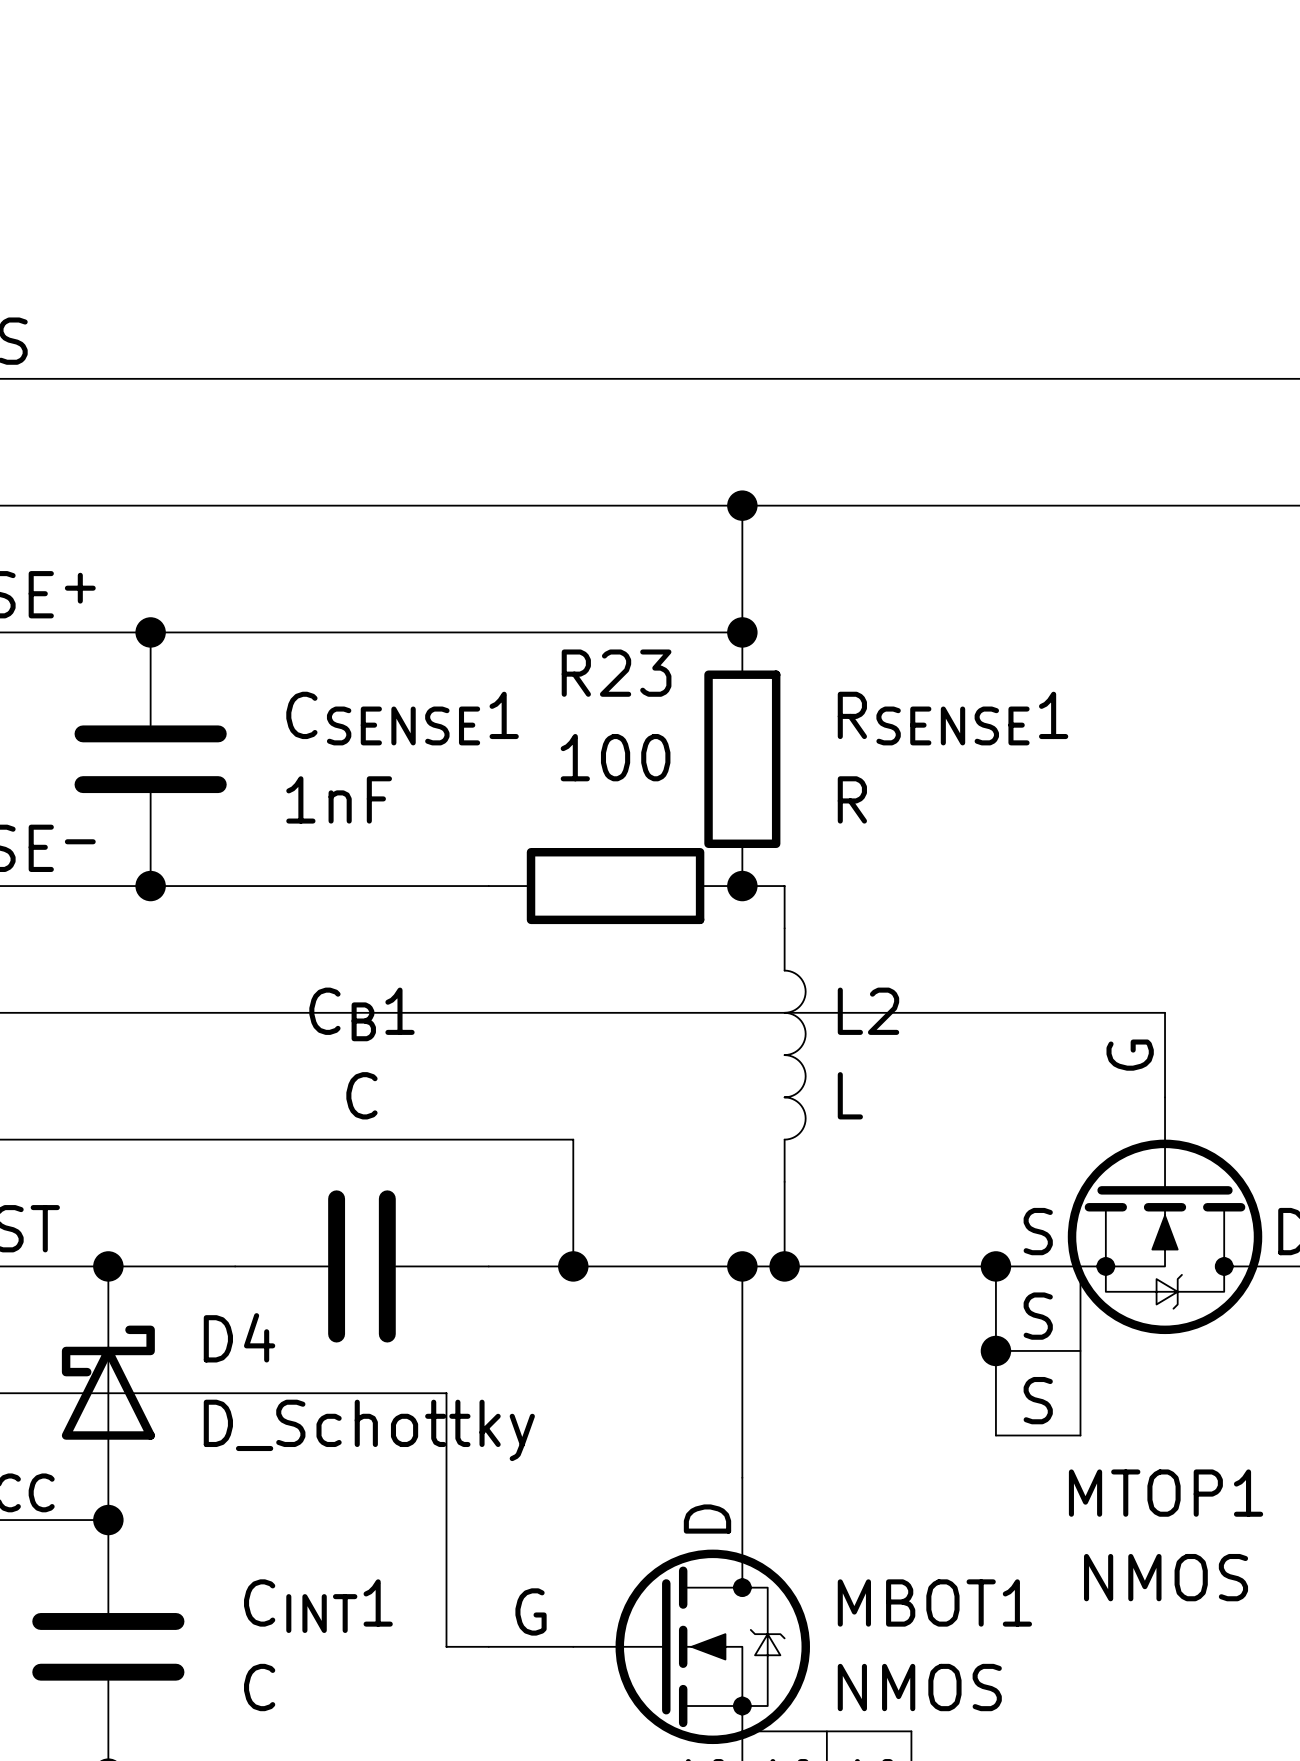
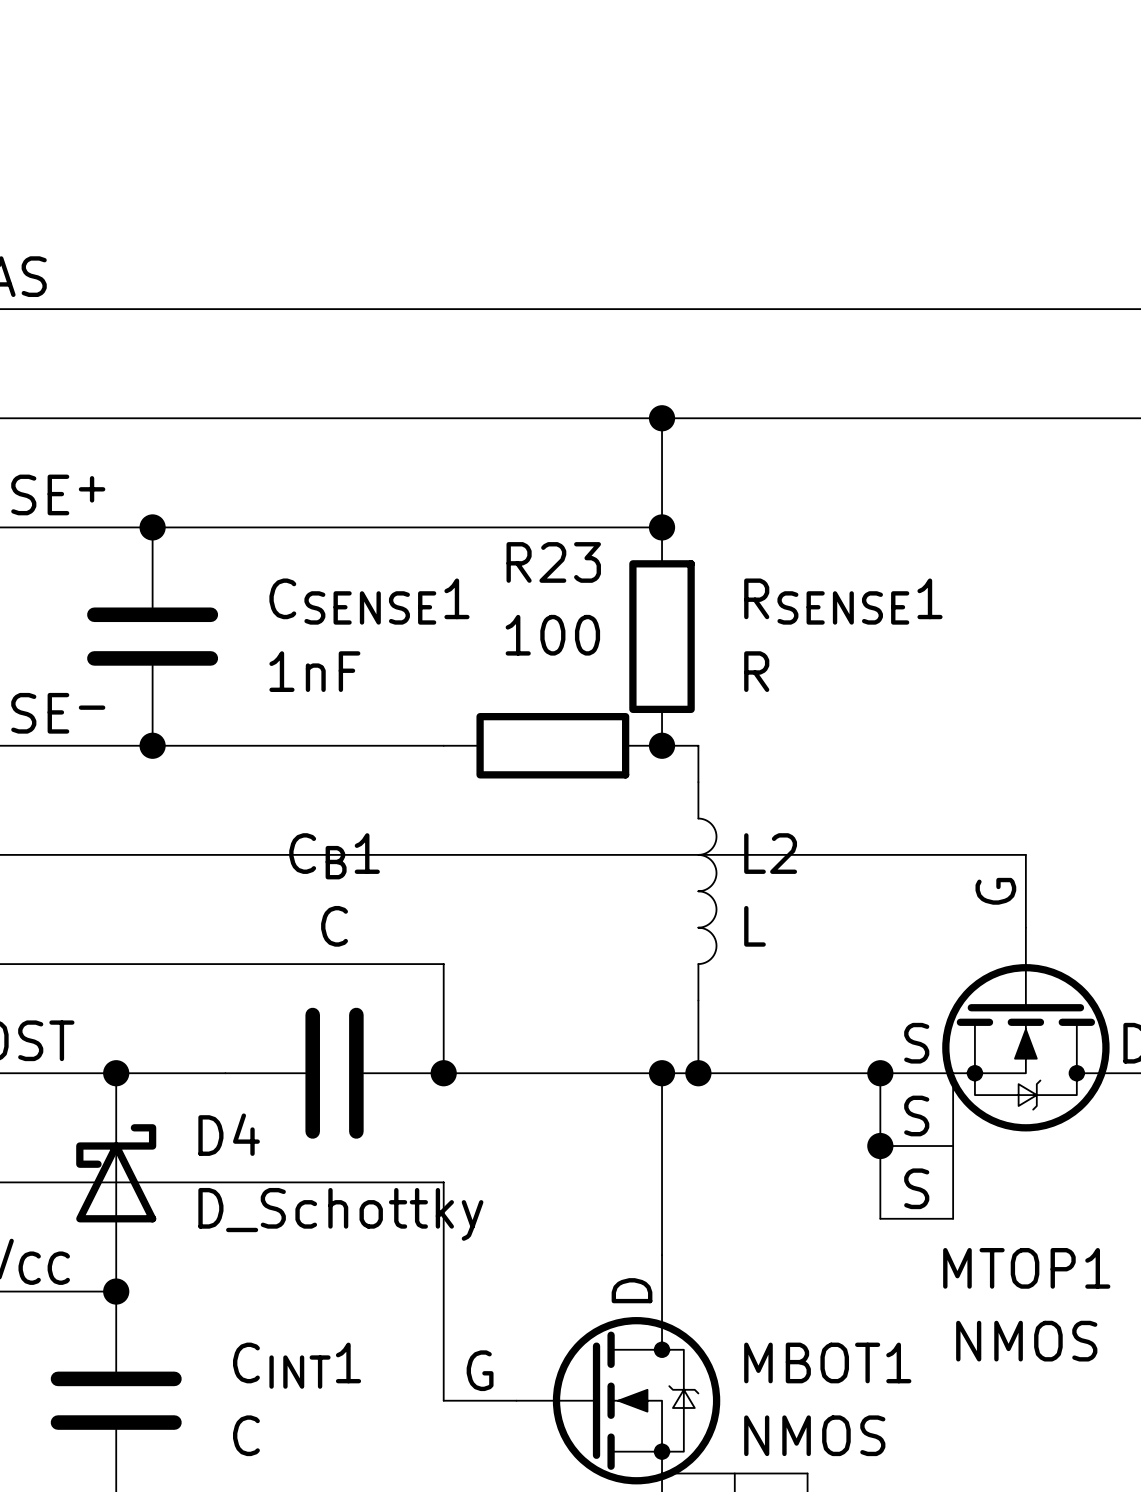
wire: (488, 1139) (573, 1139) (573, 1266) -> (443, 964) (443, 1073)
junction position: (573, 1266) -> (443, 1073)
wire: (446, 1393) (446, 1646) (488, 1646) -> (407, 1182) (443, 1182) (443, 1400)

